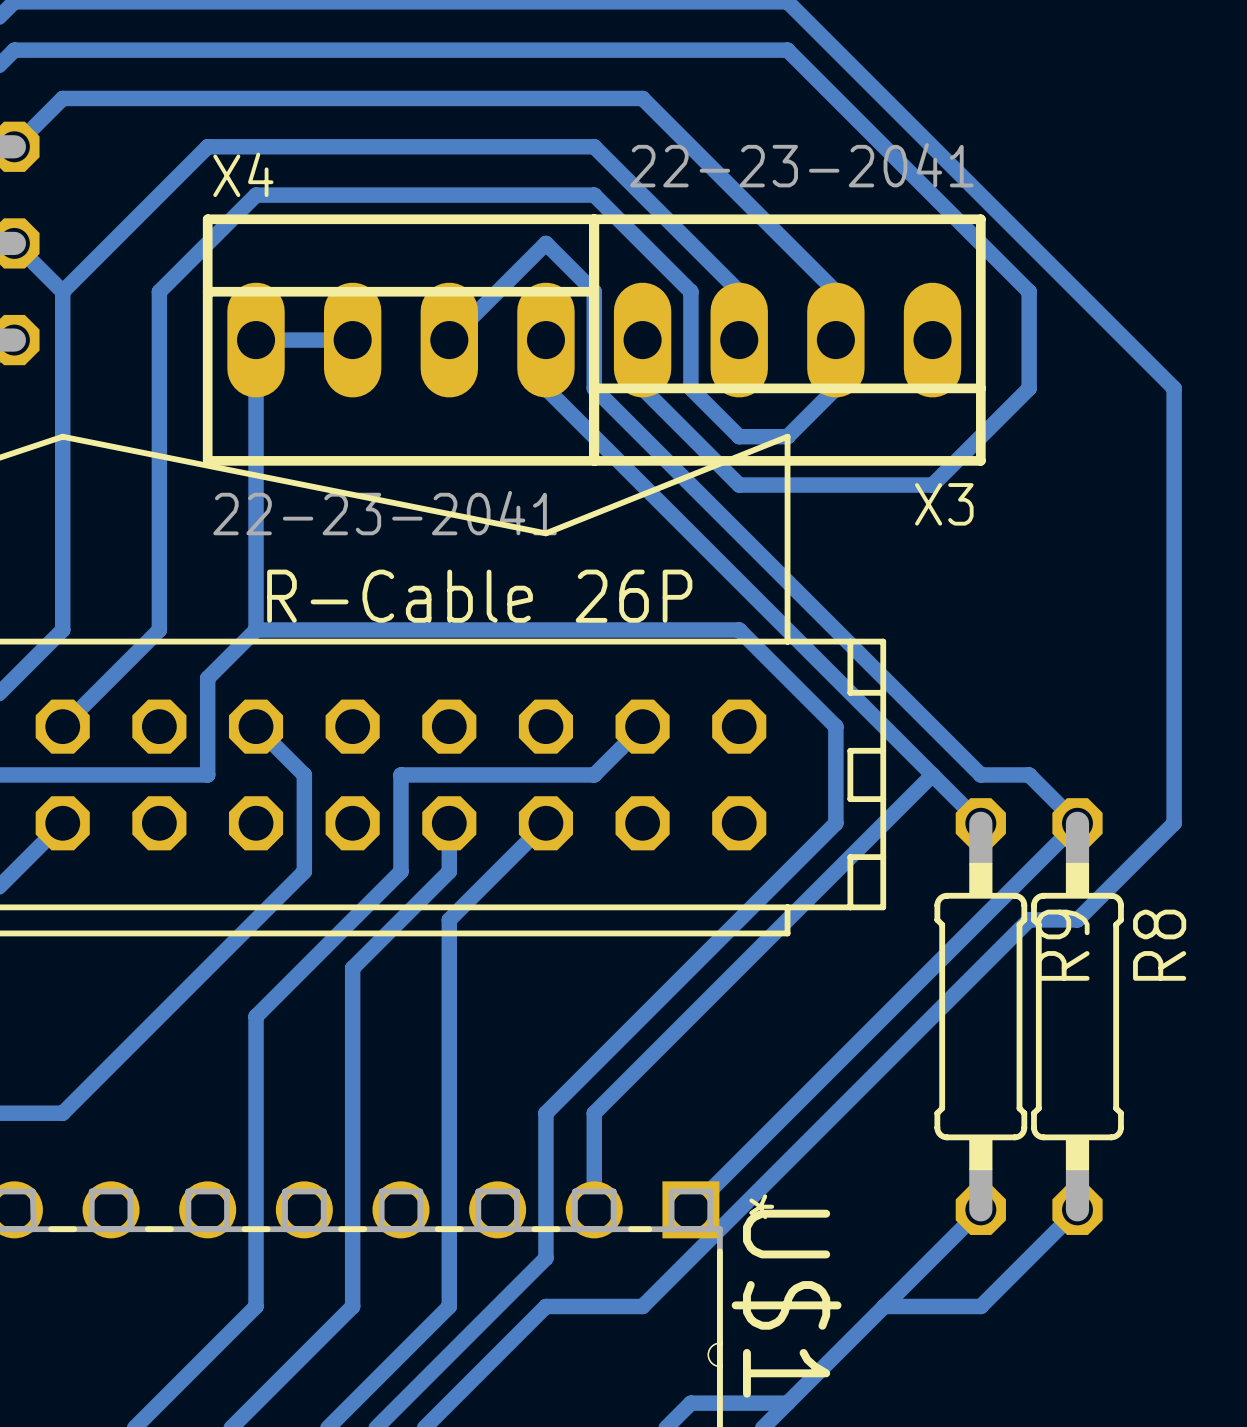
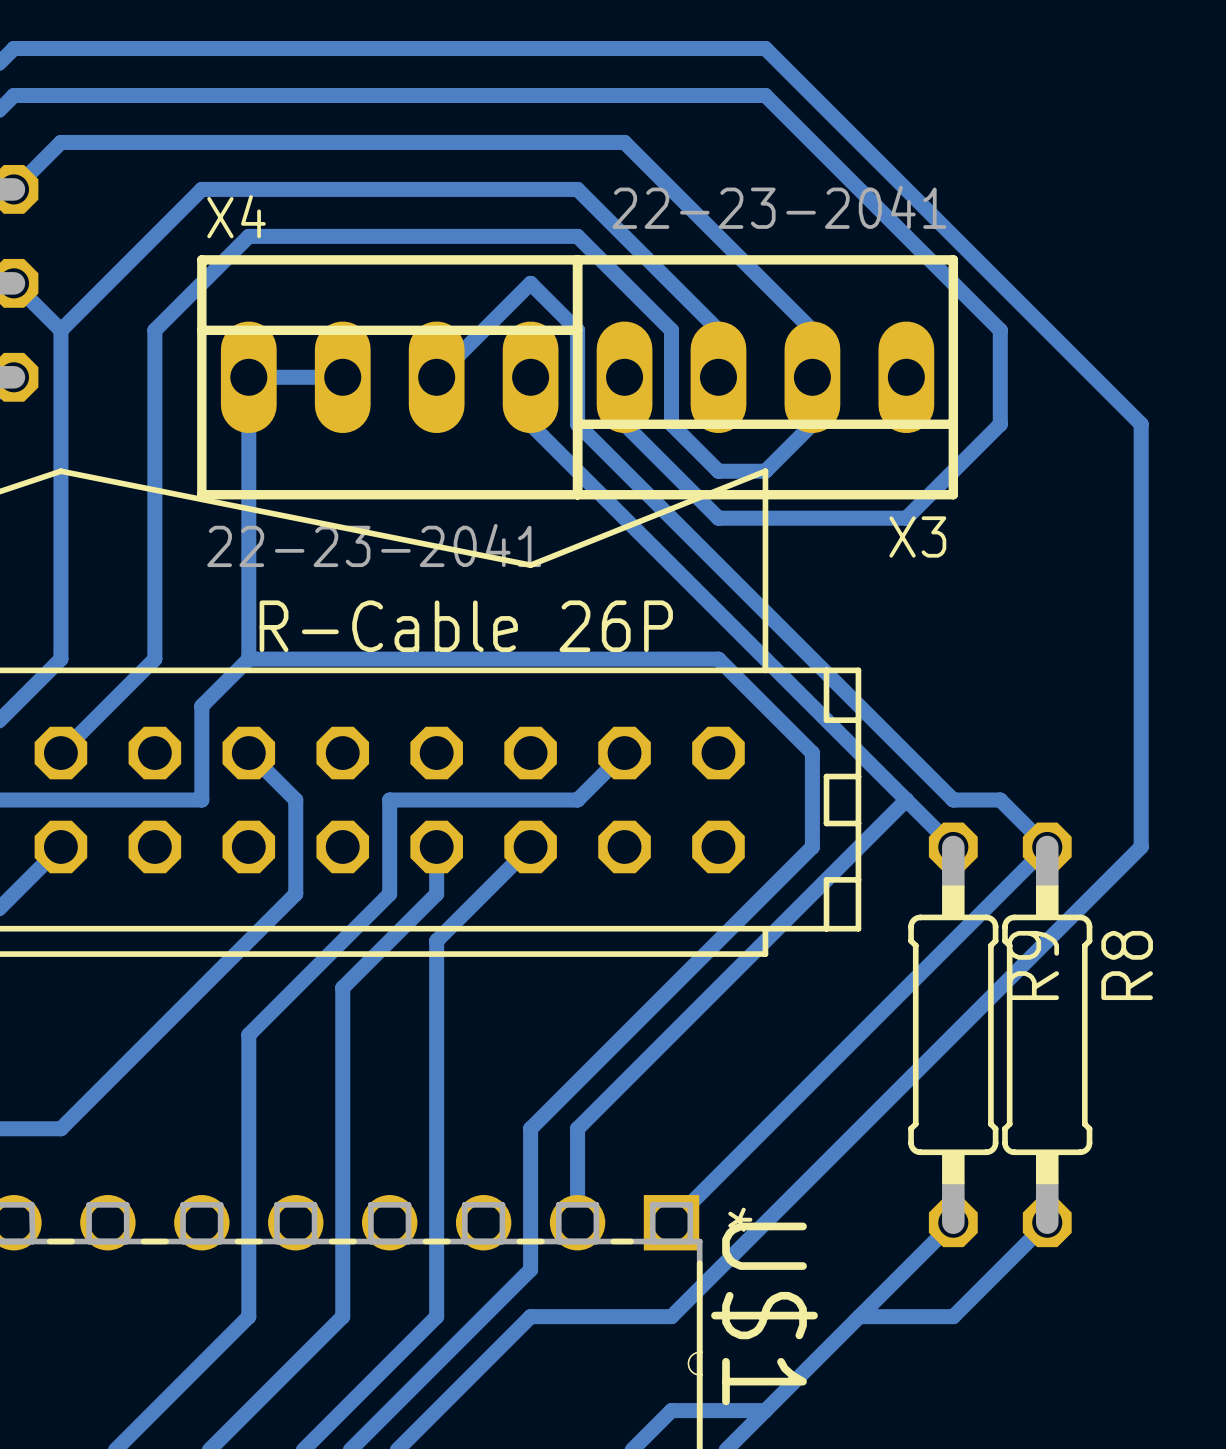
bottom track: (1077, 919) (1029, 919) (642, 1306) -> (1047, 940) (671, 1316) (624, 1316)

